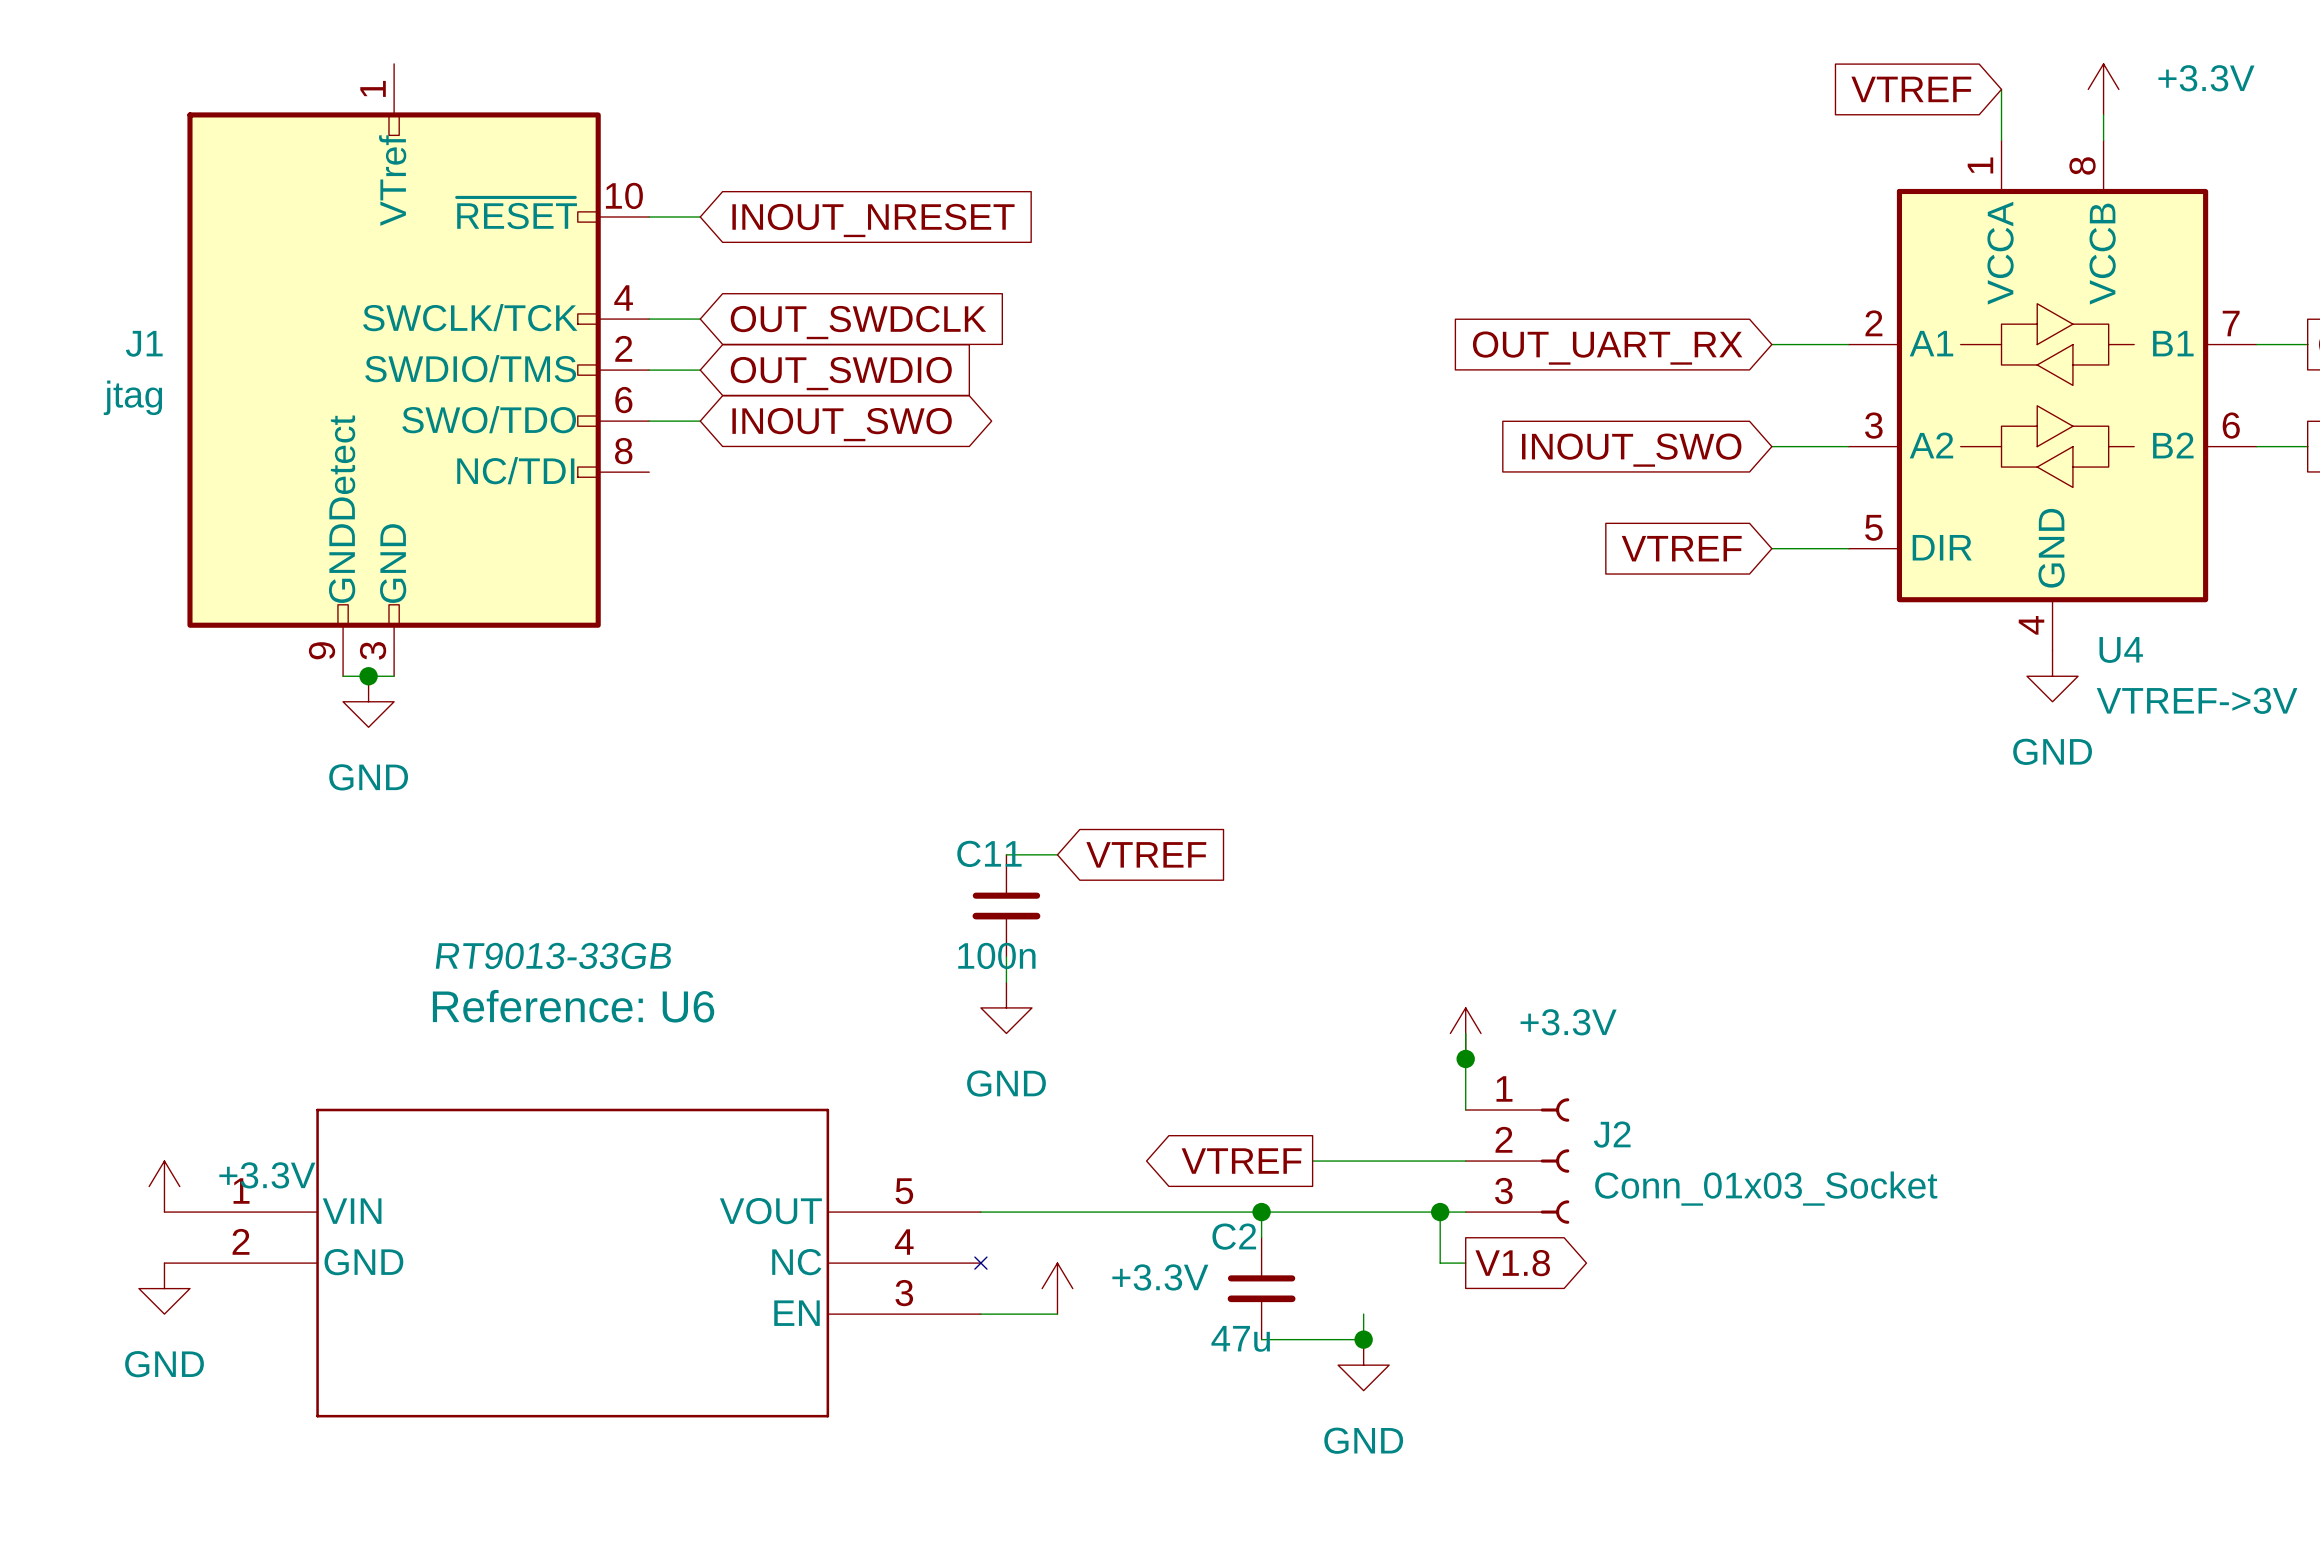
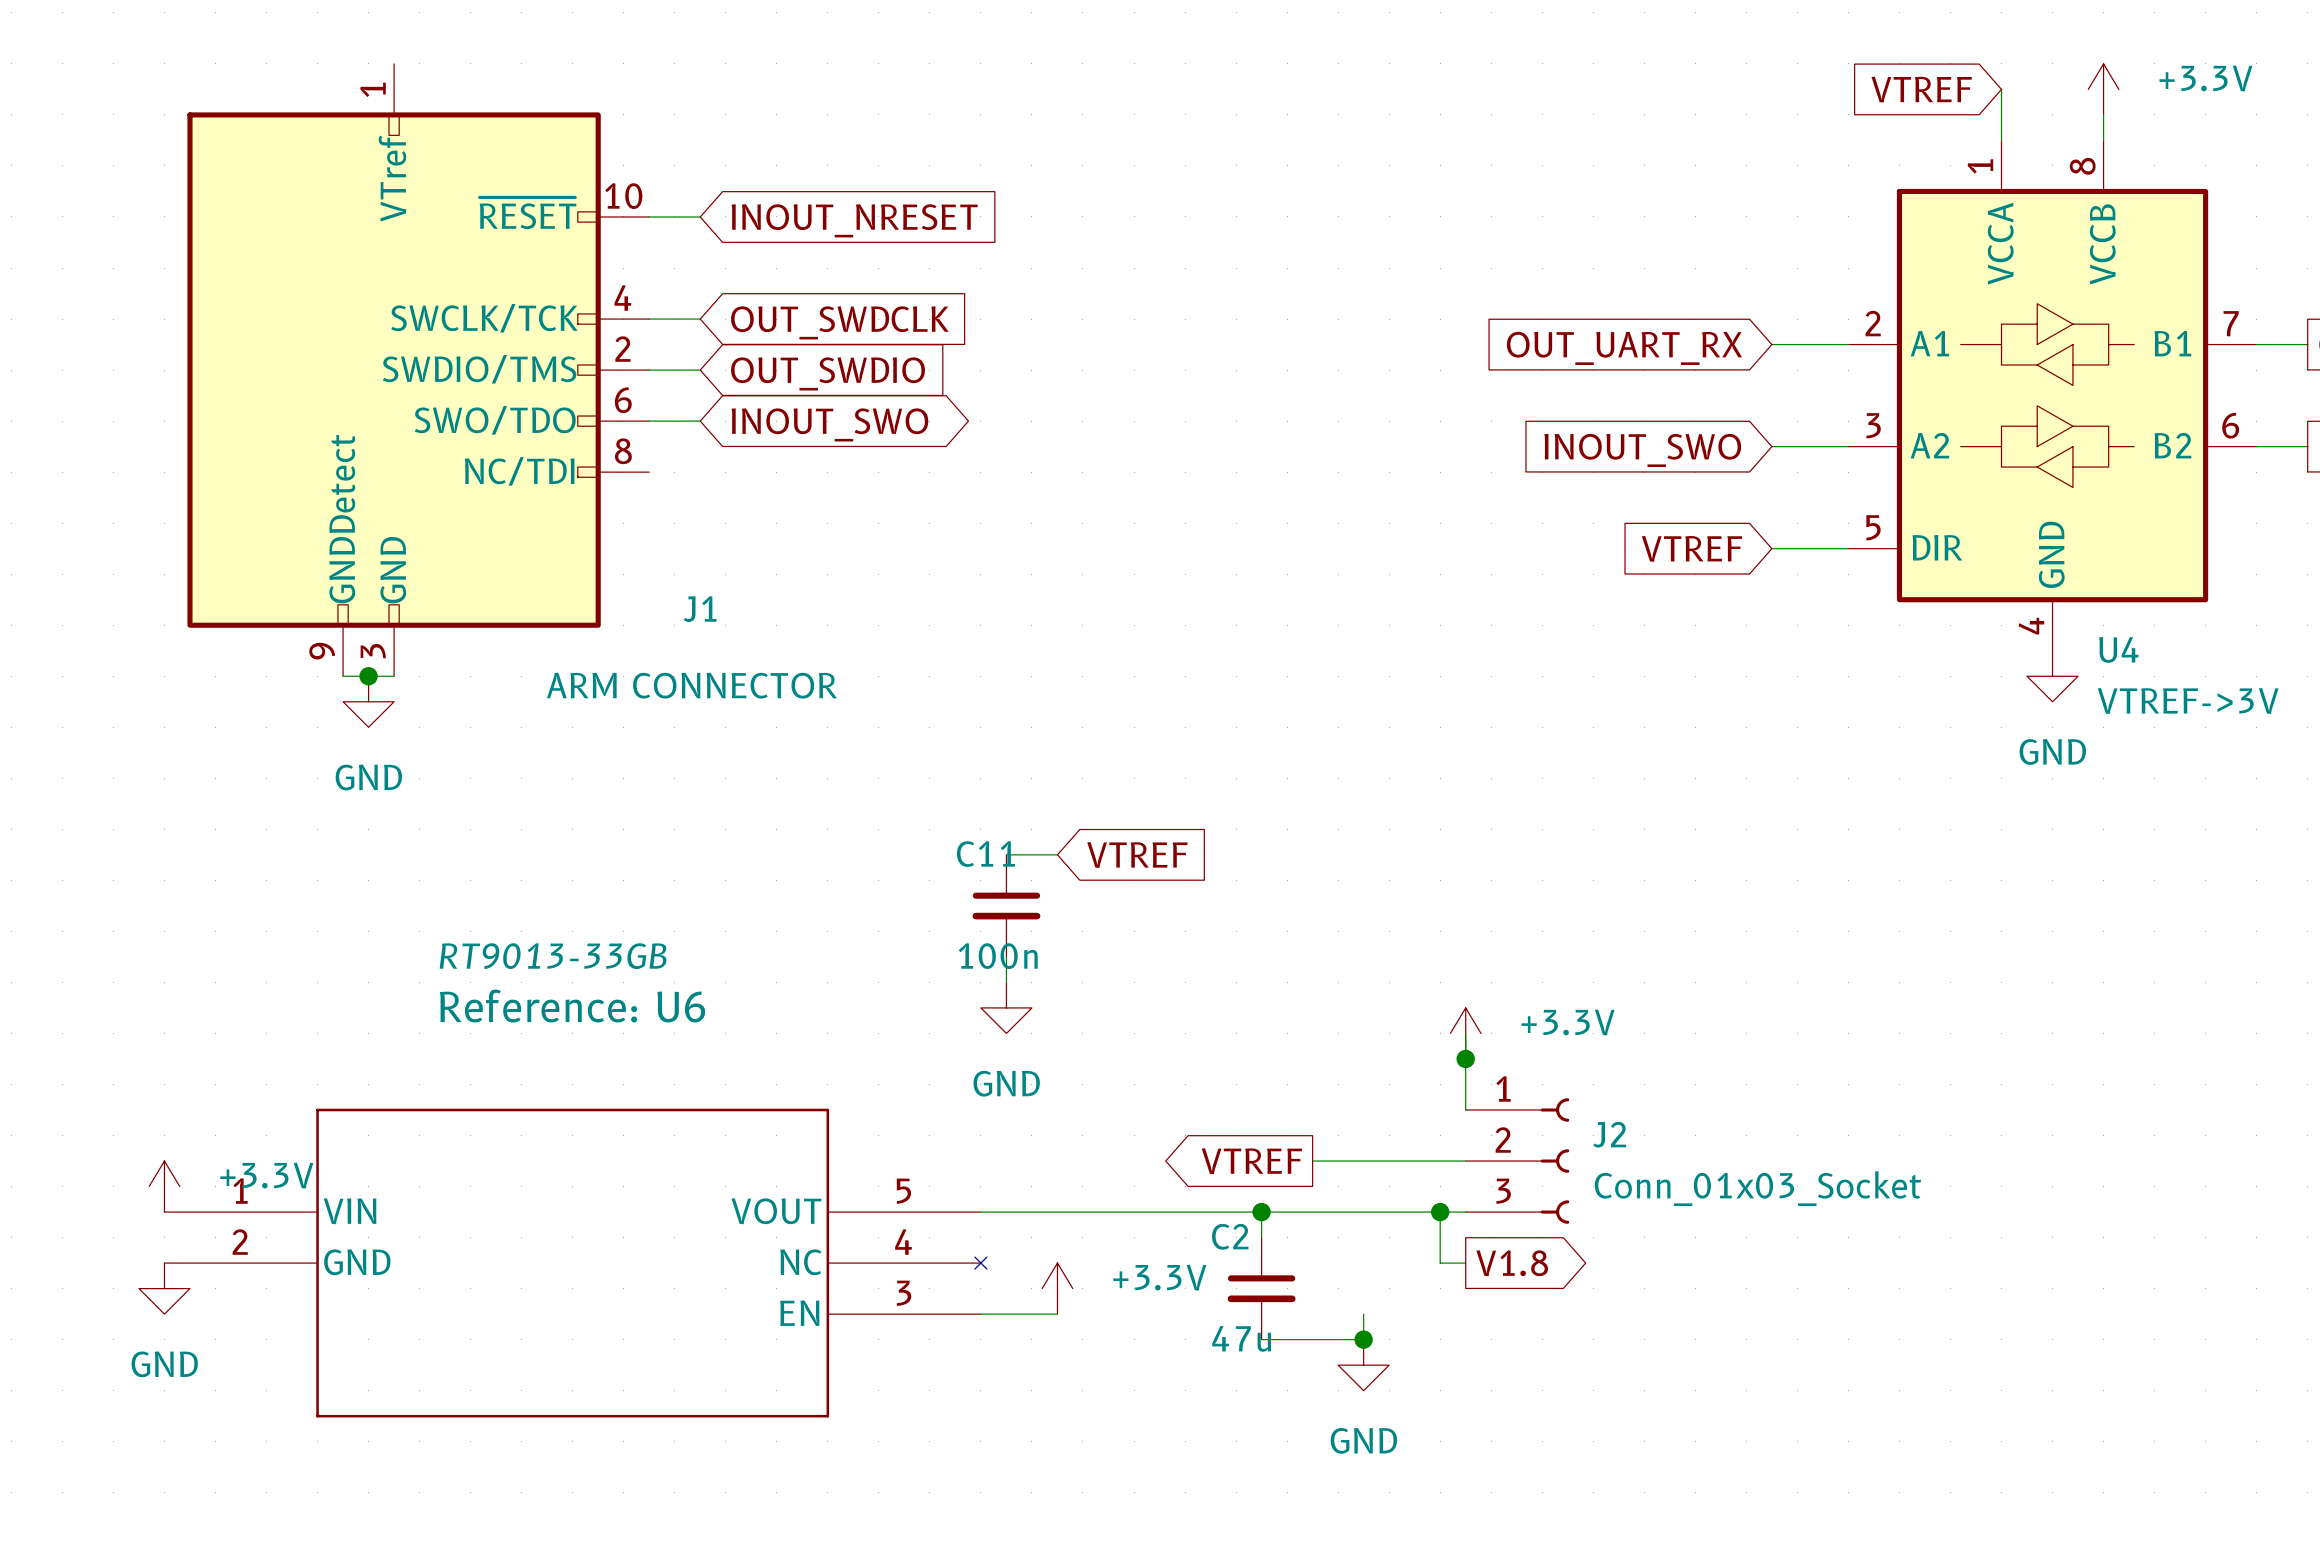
J1 name position: J1 (144, 343) -> J1 (700, 609)
J1 value: jtag (132, 397) -> ARM CONNECTOR (691, 685)

